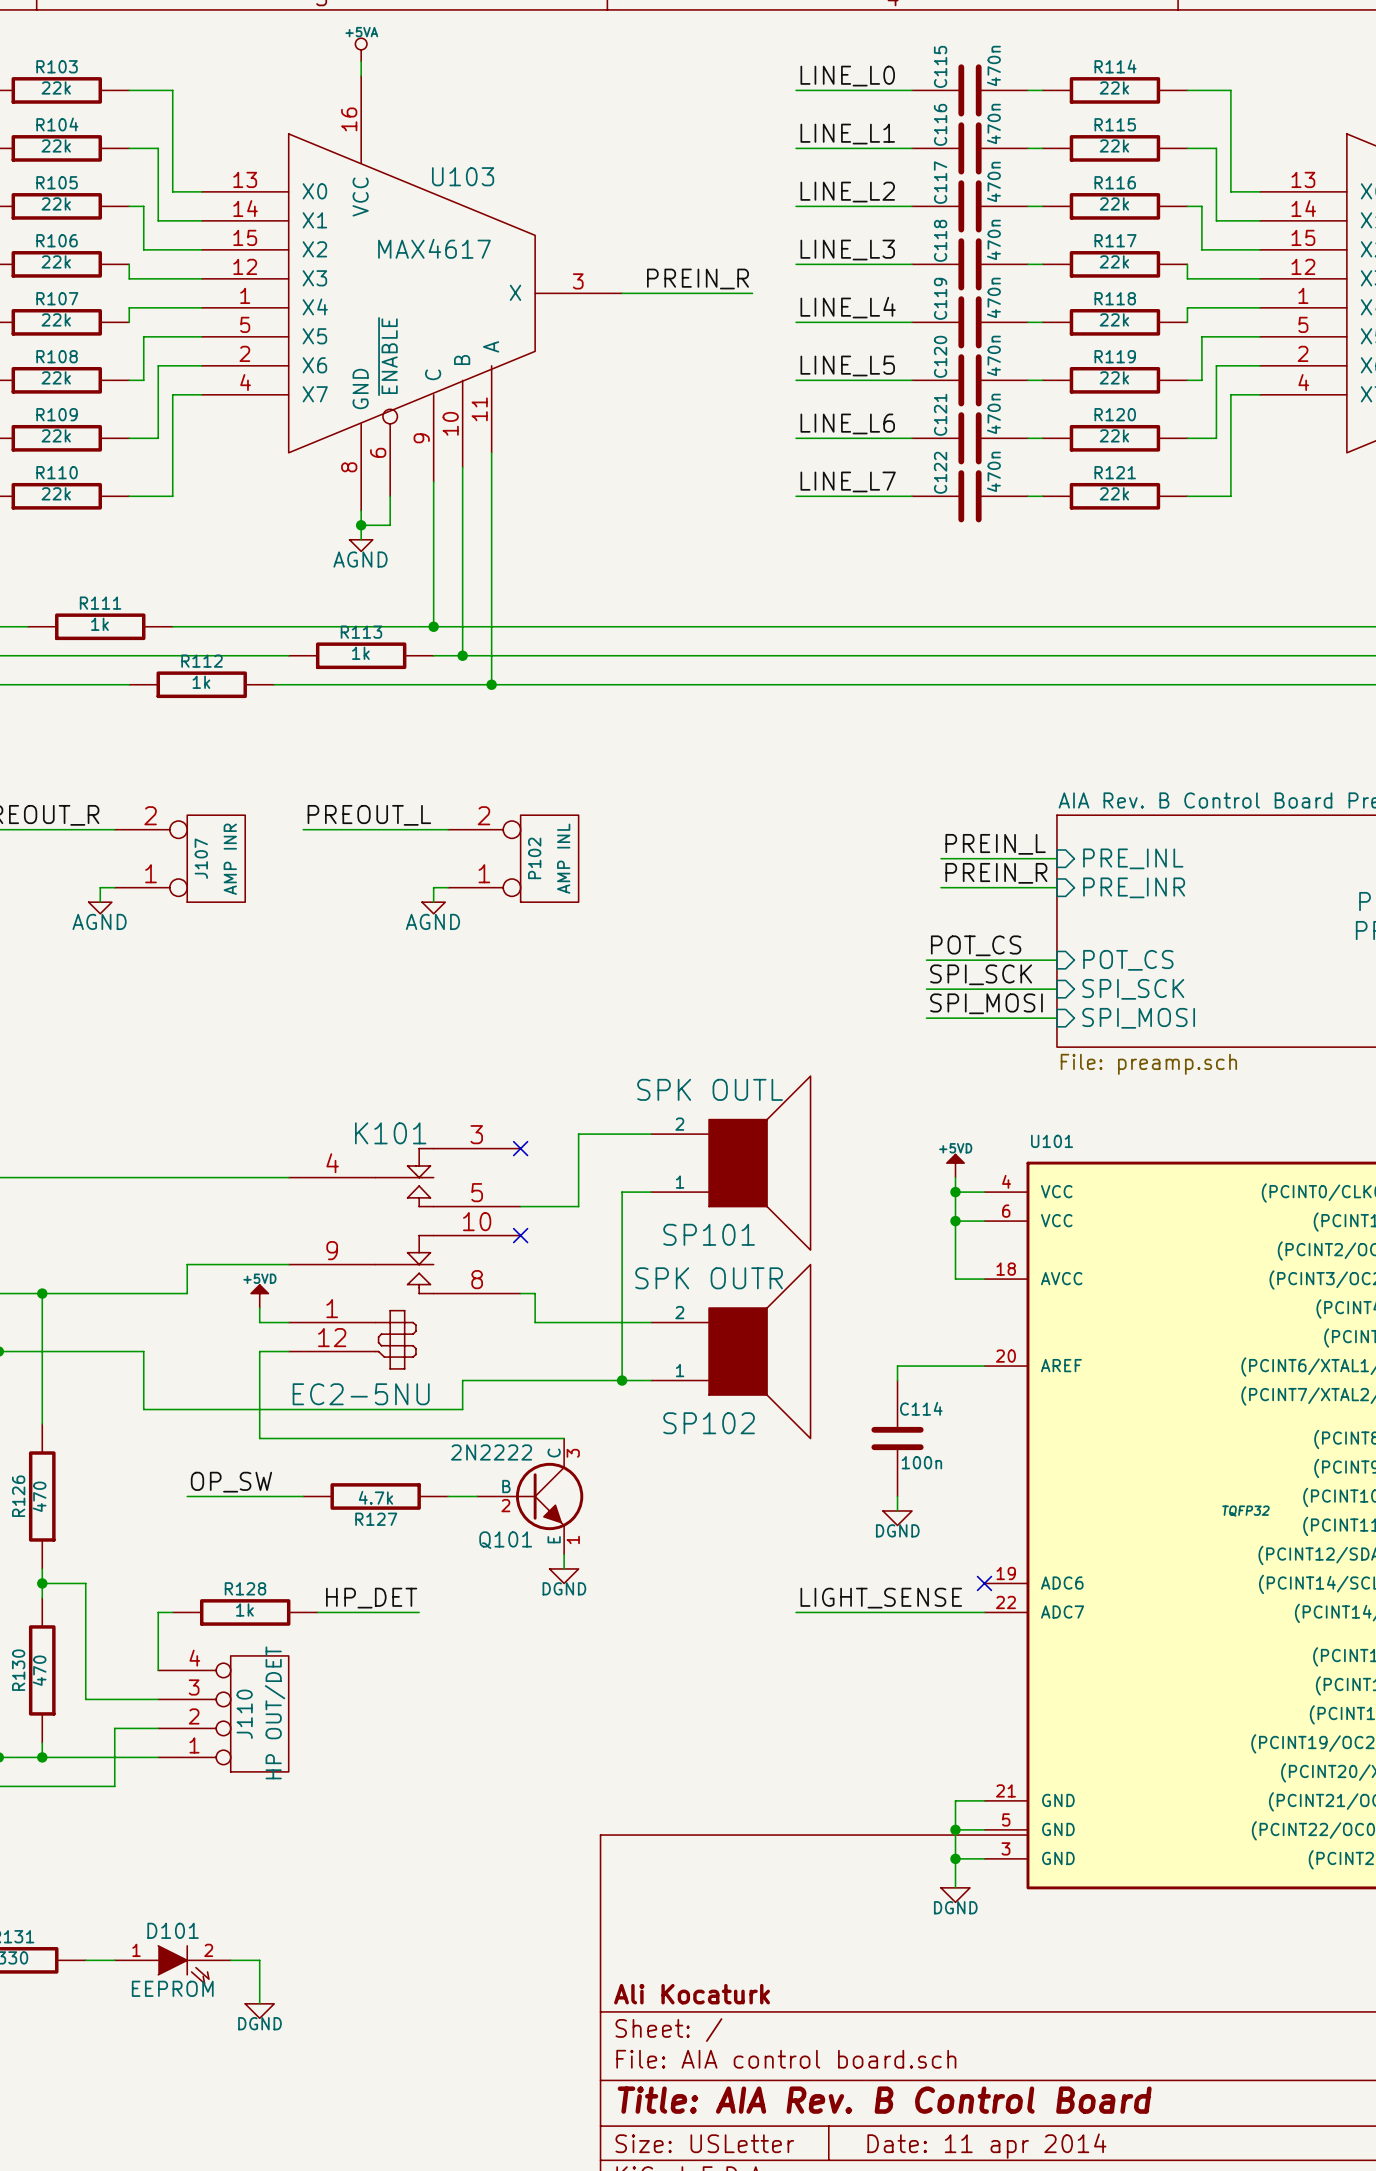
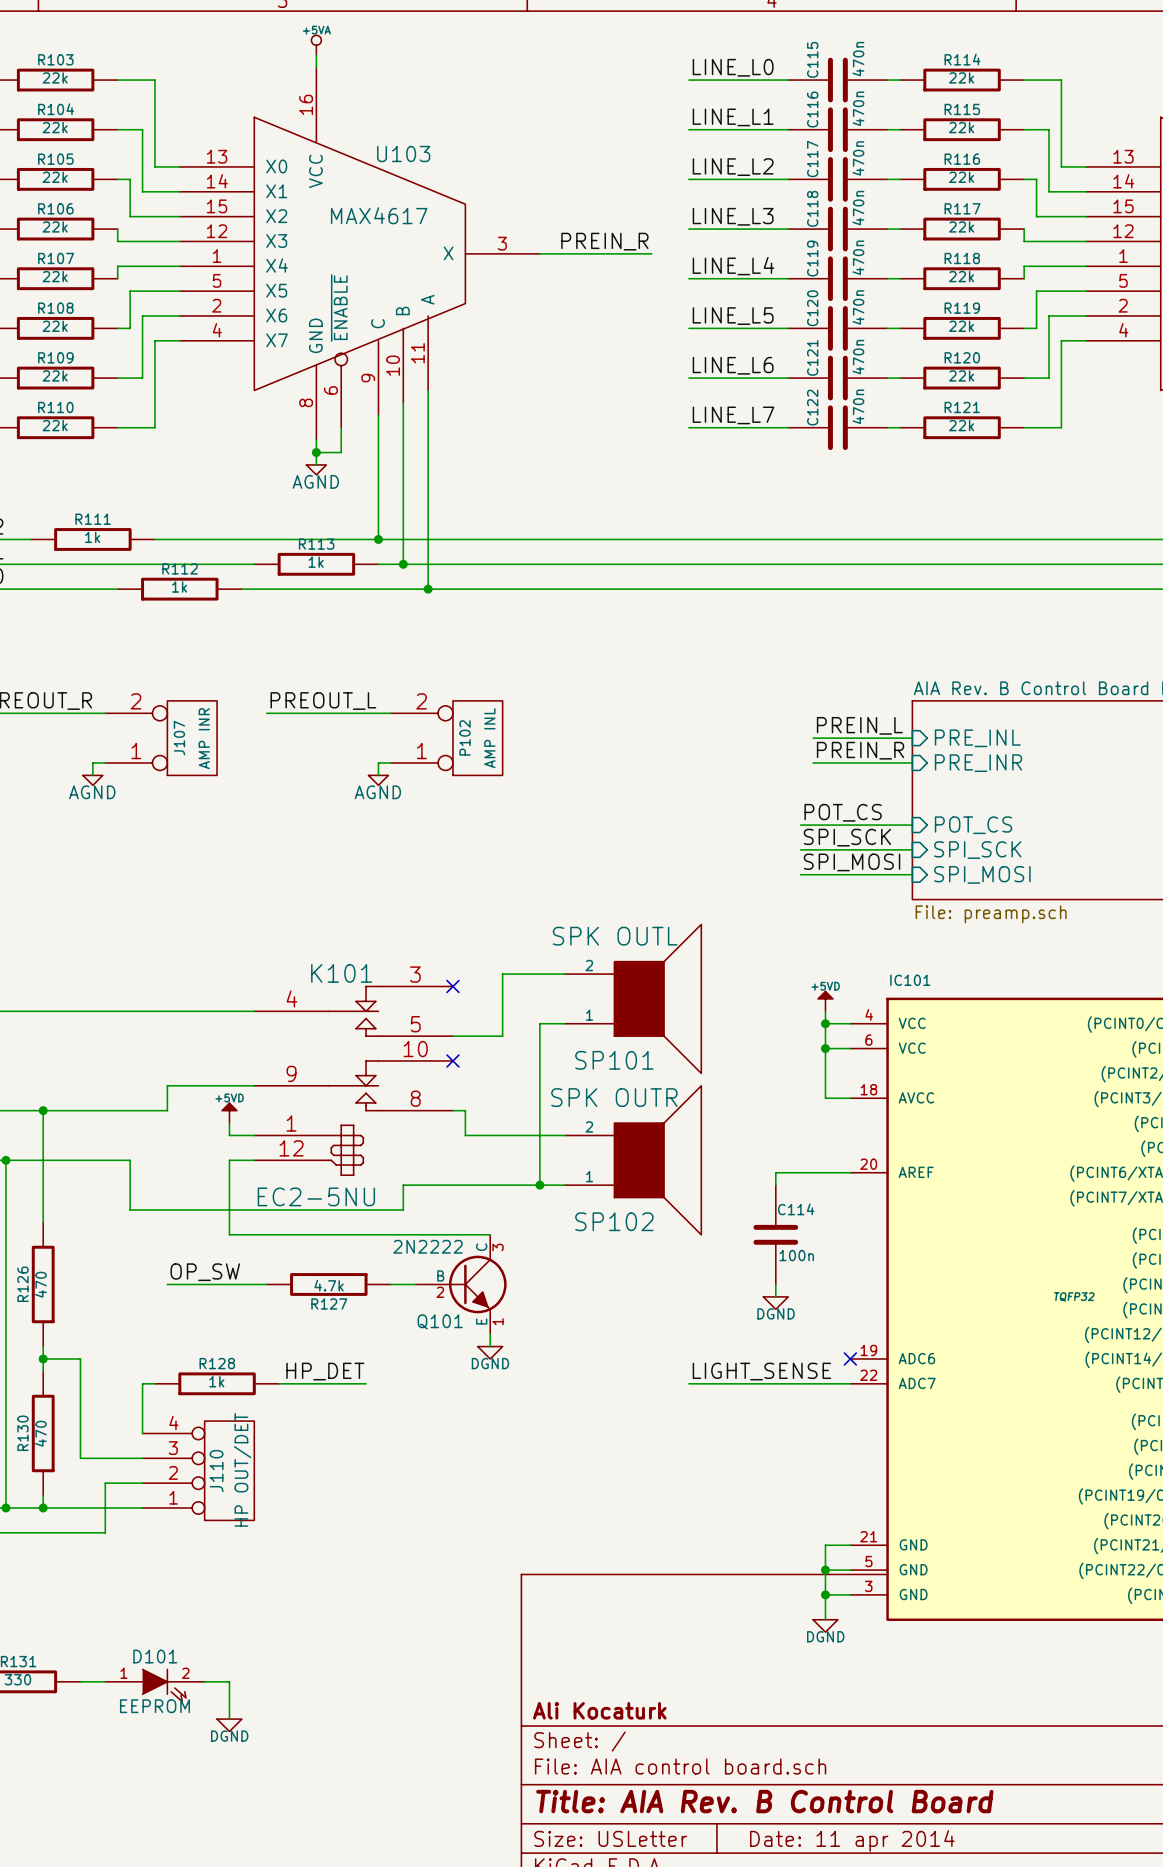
U101 name: U101 (1052, 1141) -> IC101 (910, 980)

